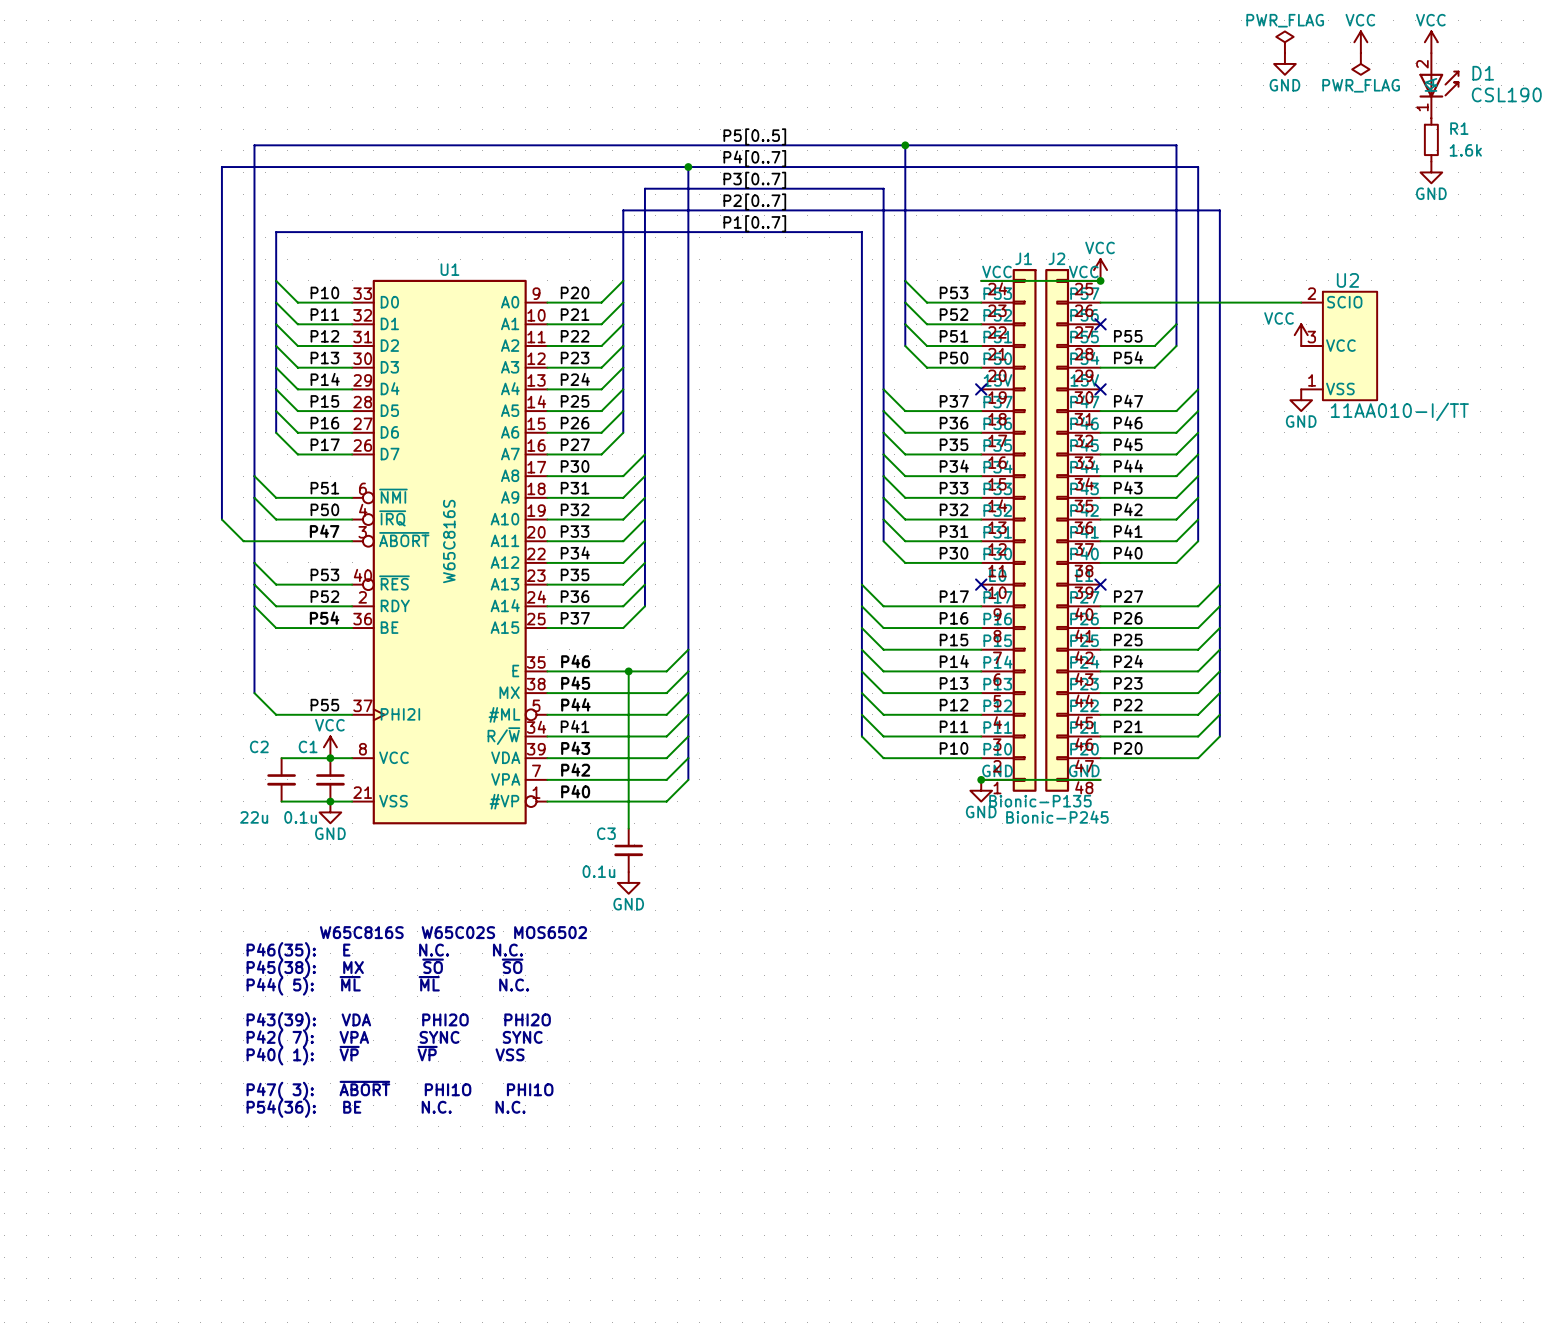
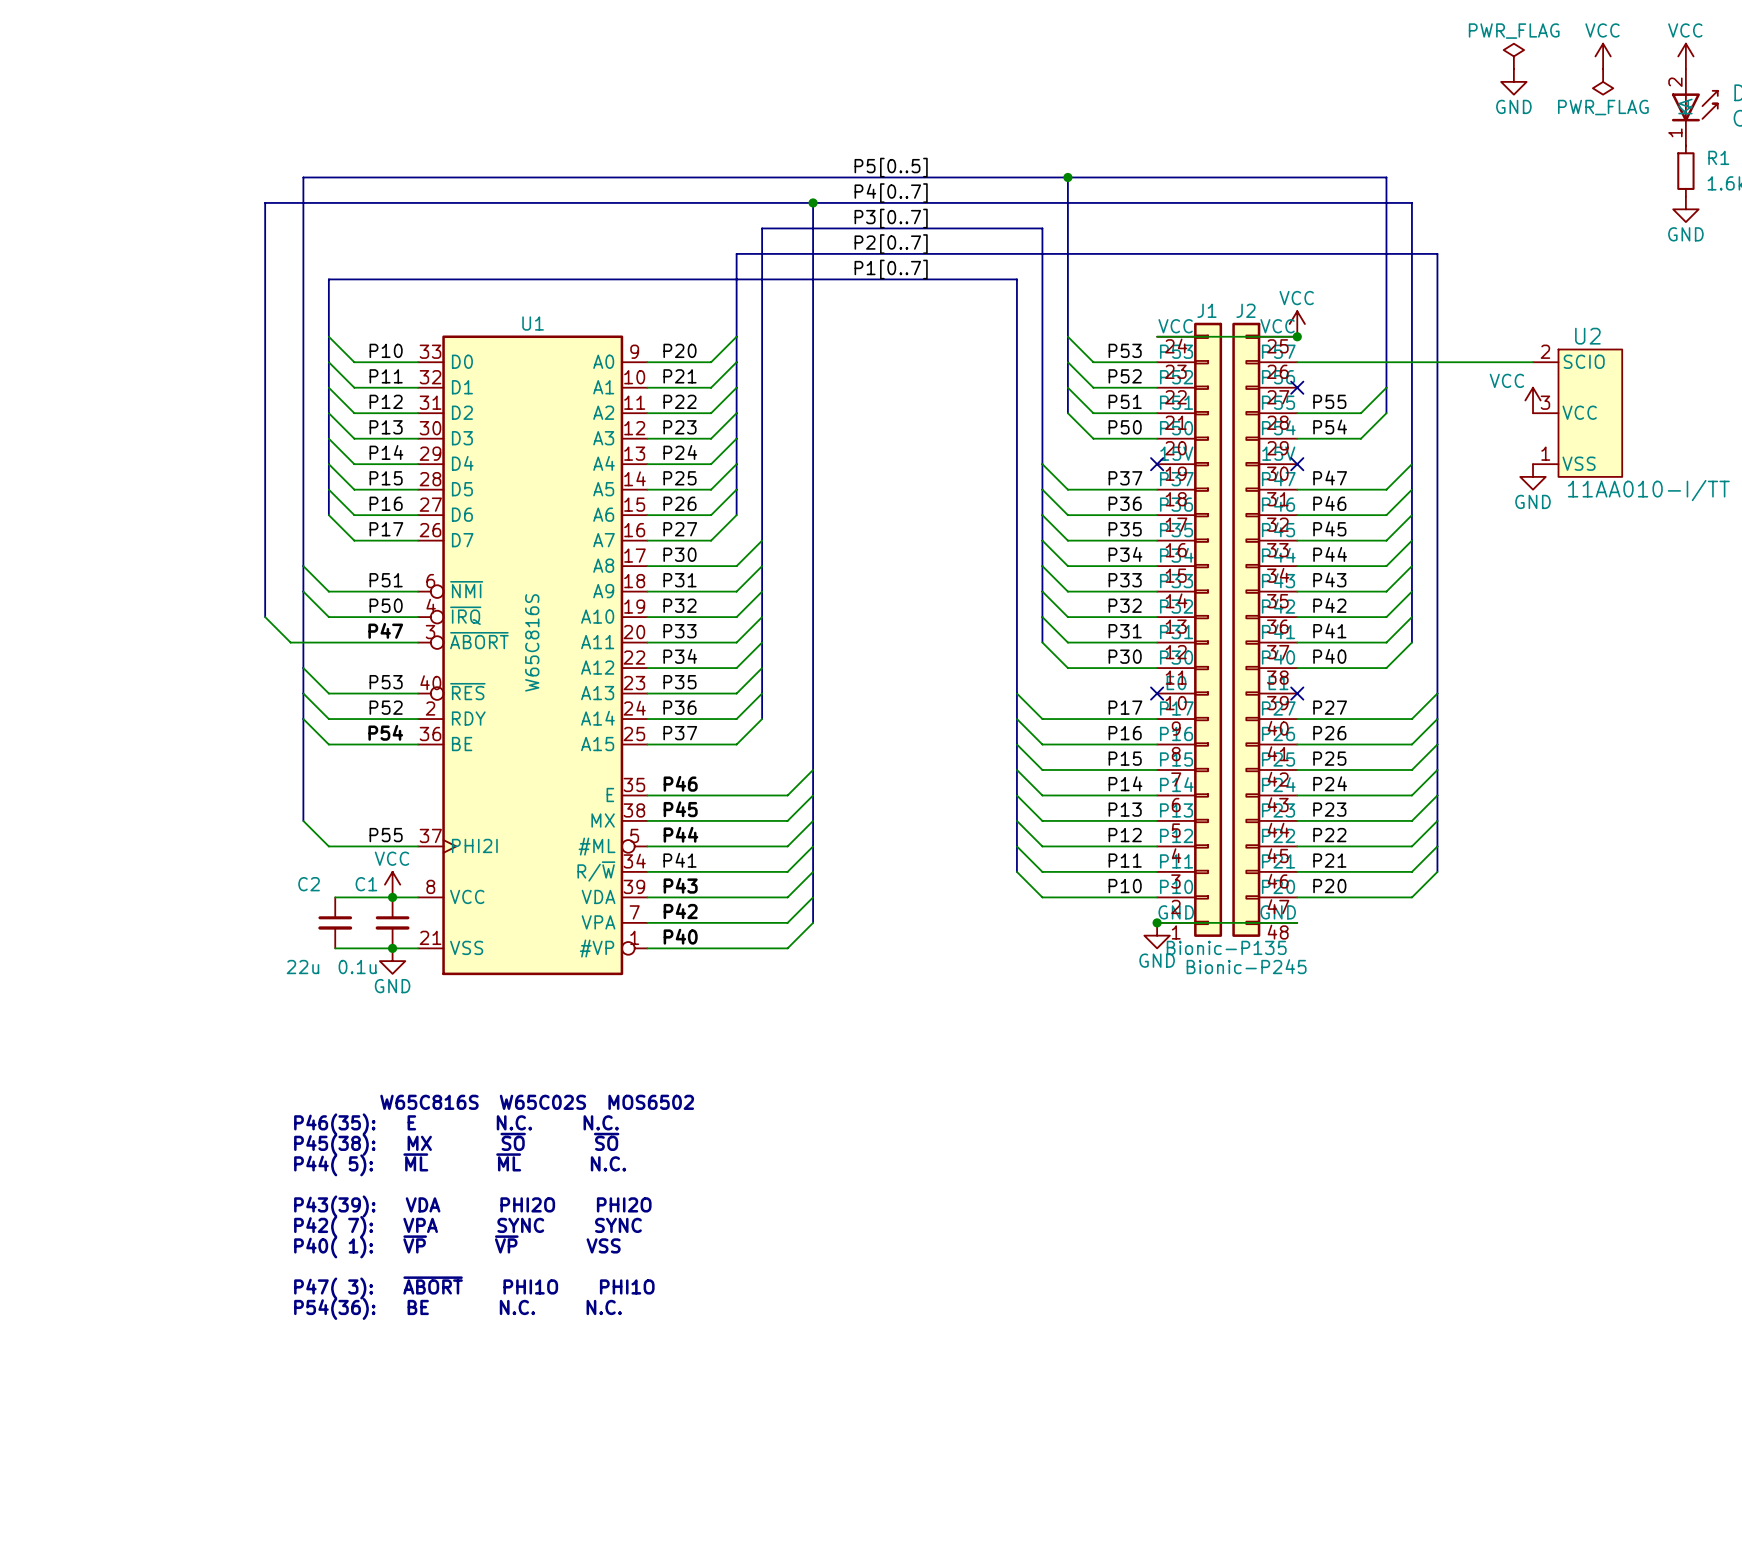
wire: (628, 671) (628, 828) -> none
junction: (628, 671) -> none
C3: 0.1u (628, 850) -> none
power symbol: GND (628, 882) -> none

